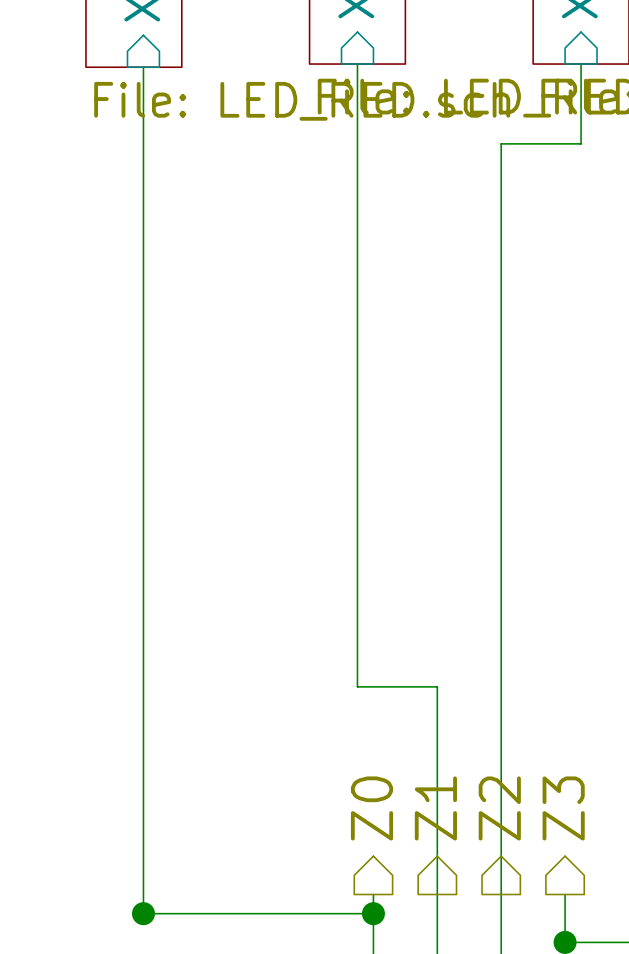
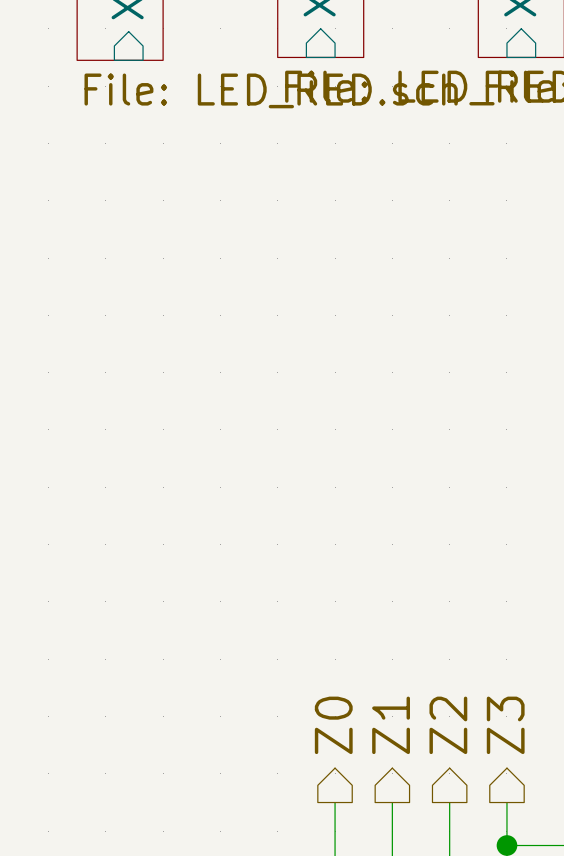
wire: (357, 64) (357, 686) (437, 686) (437, 894) -> none
wire: (581, 64) (581, 143) (501, 143) (501, 894) -> none
wire: (143, 67) (143, 913) -> none
wire: (140, 913) (373, 913) -> none
junction: (143, 913) -> none
junction: (373, 913) -> none

